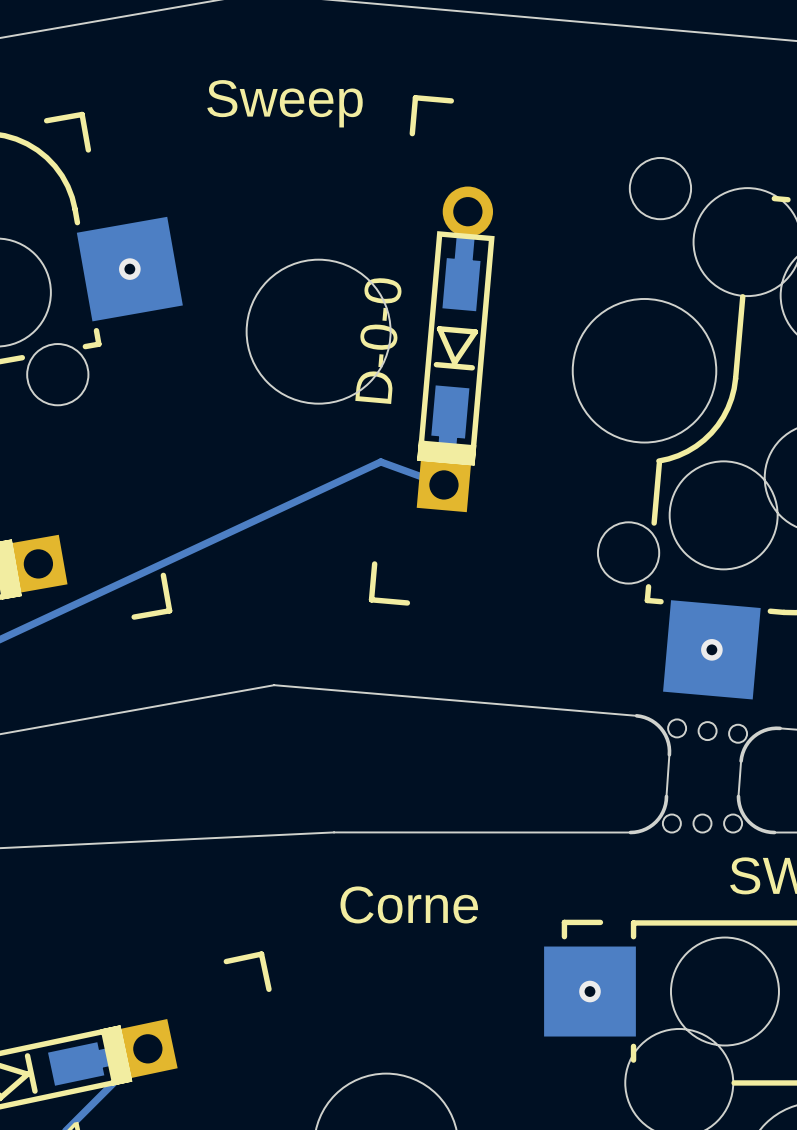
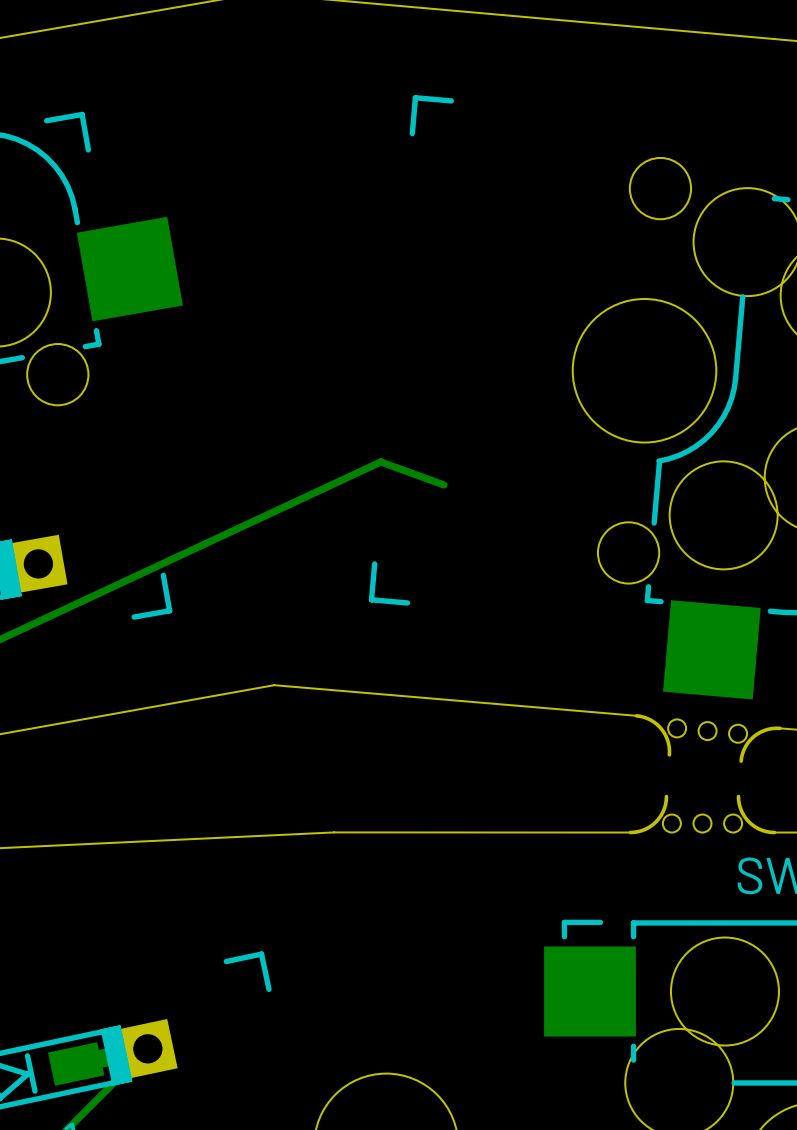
text: Sweep (285, 103) -> none
round board edge: [245, 258, 392, 405] -> none
via: (129, 269) -> none
D-0-0: (455, 349) -> none
via: (711, 649) -> none
board edge: (669, 754) (666, 796) -> none
board edge: (741, 761) (738, 796) -> none
text: Corne (409, 904) -> none
via: (589, 991) -> none

